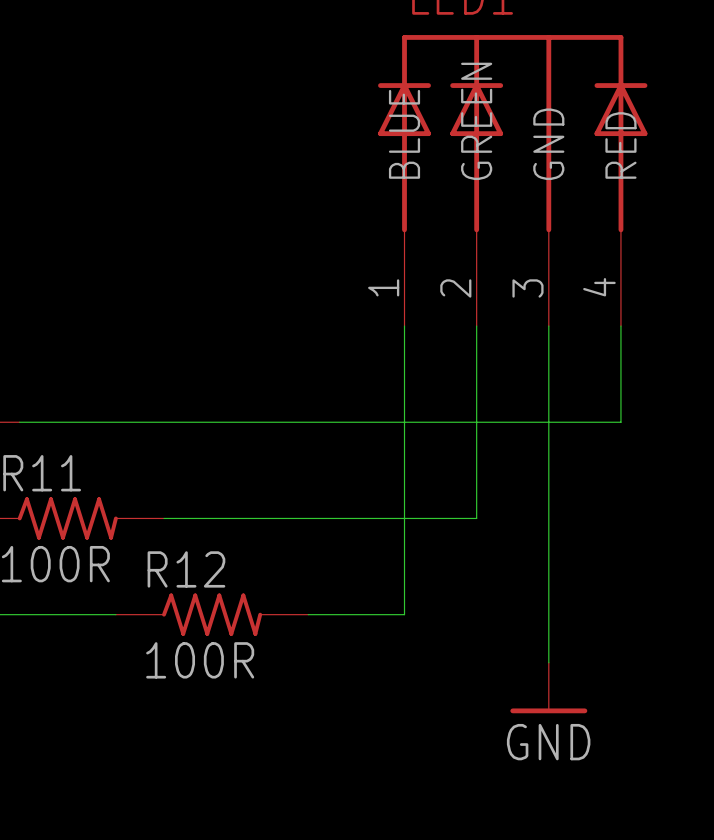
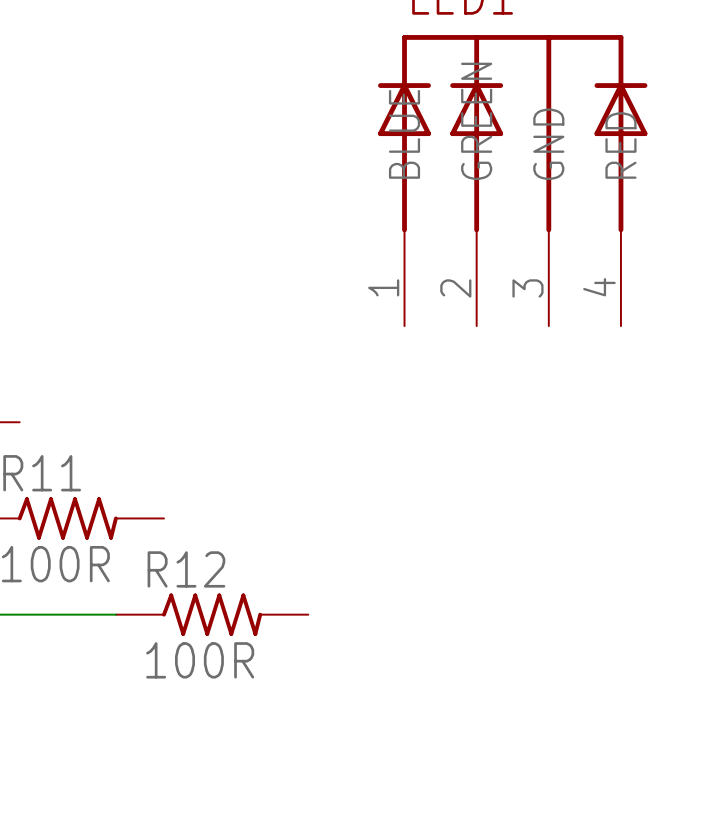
wire: (404, 326) (404, 614) (308, 614) -> none
wire: (476, 326) (476, 518) (164, 518) -> none
wire: (548, 326) (548, 662) -> none
wire: (620, 326) (620, 422) (19, 422) -> none
power symbol: GND (548, 688) -> none

